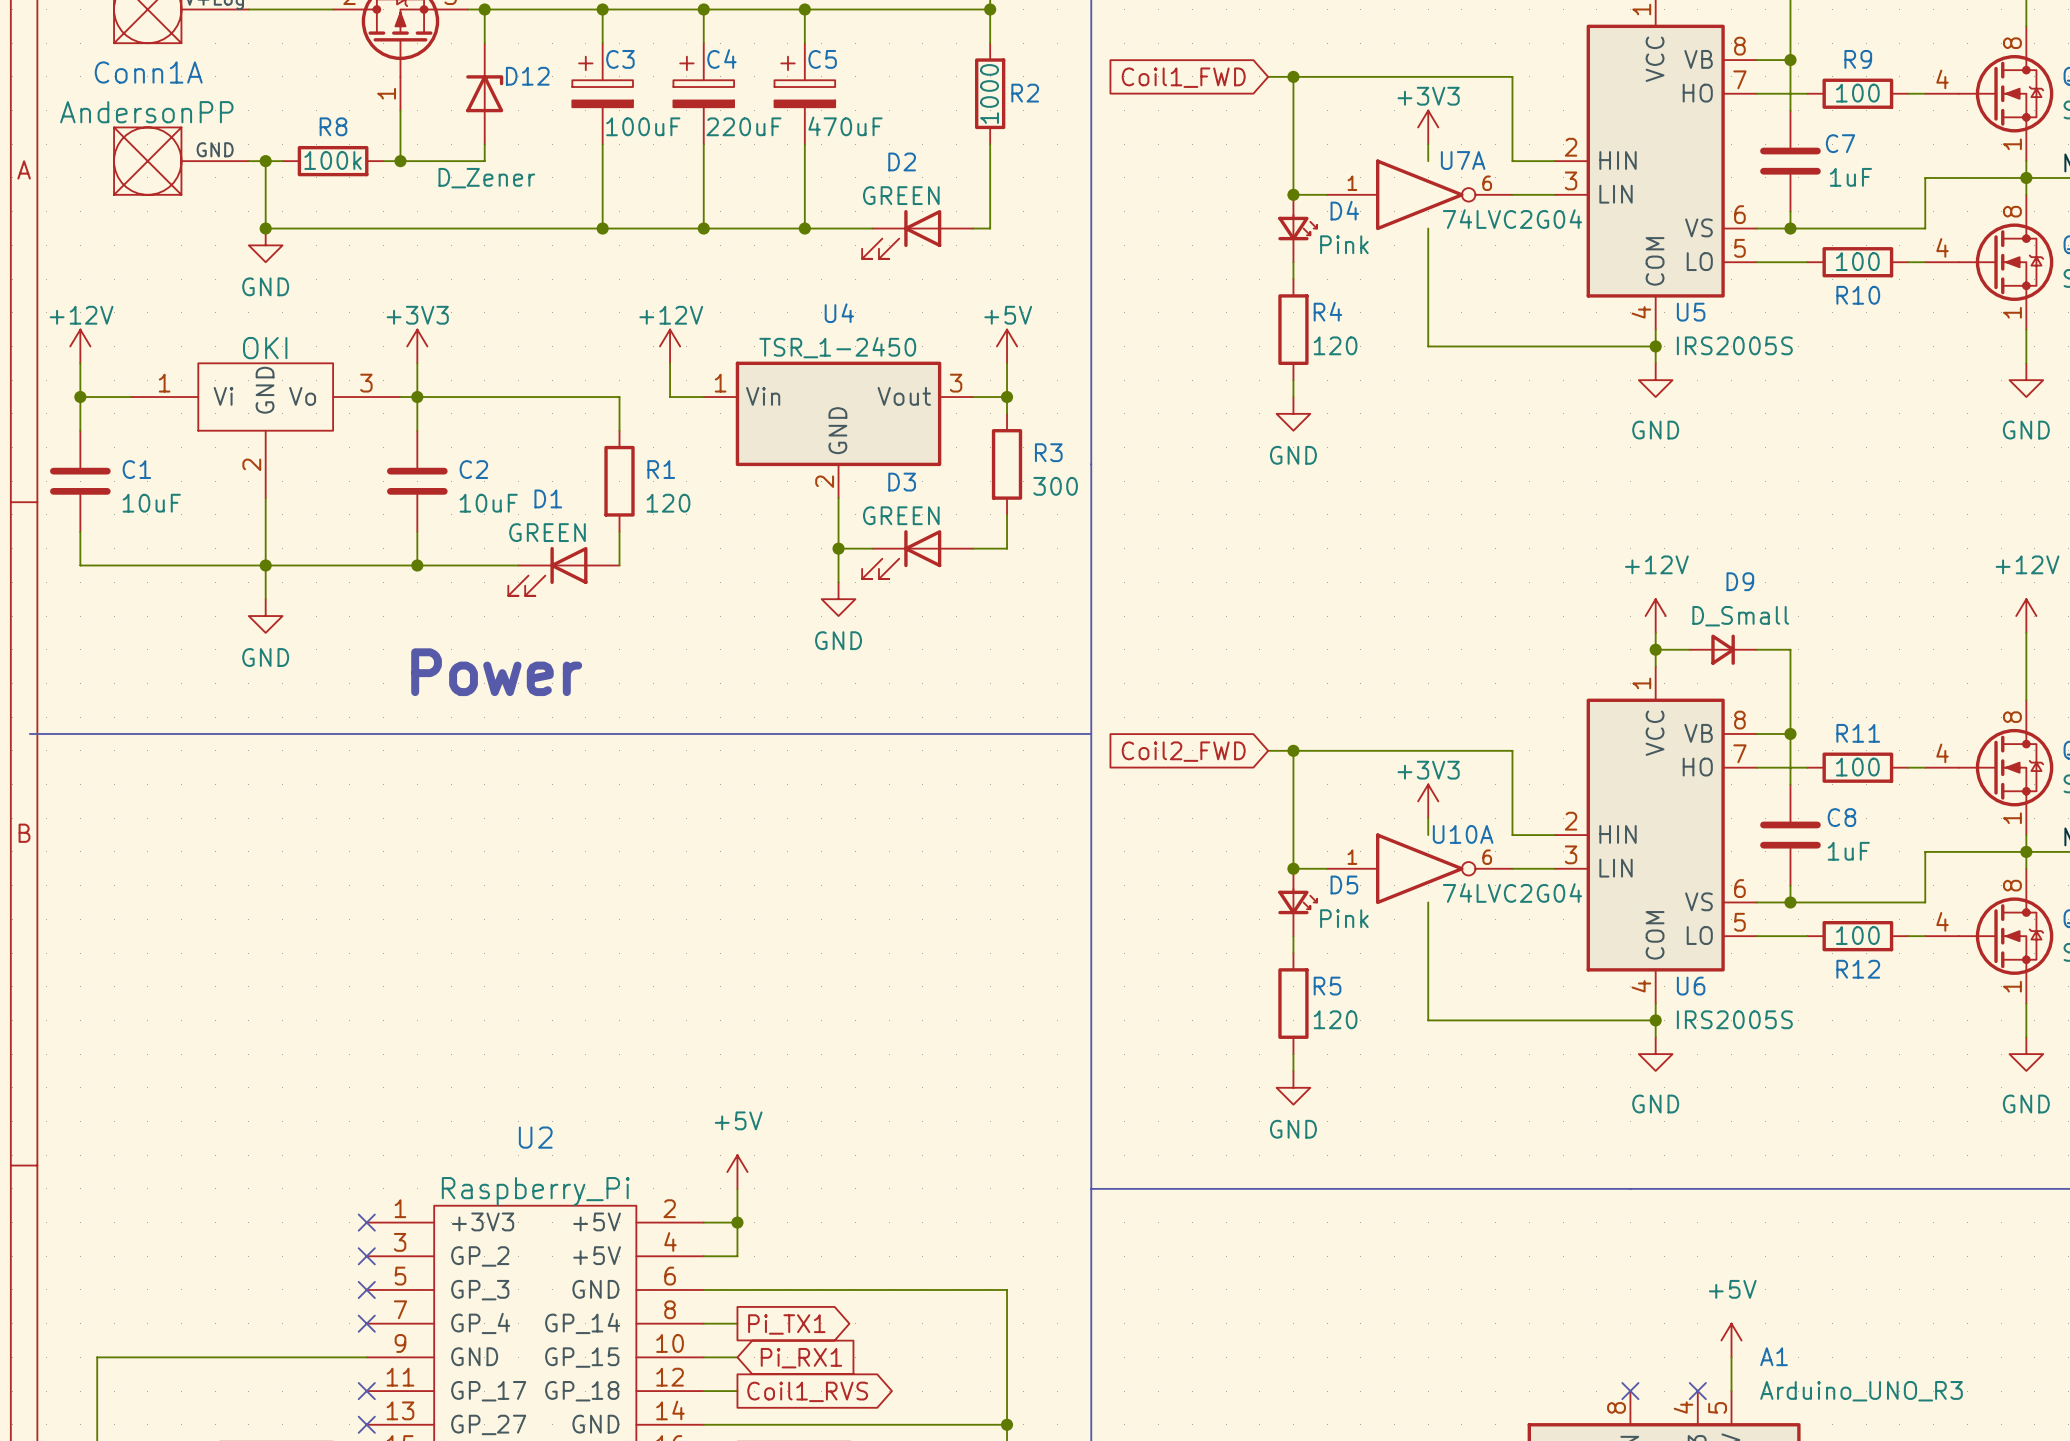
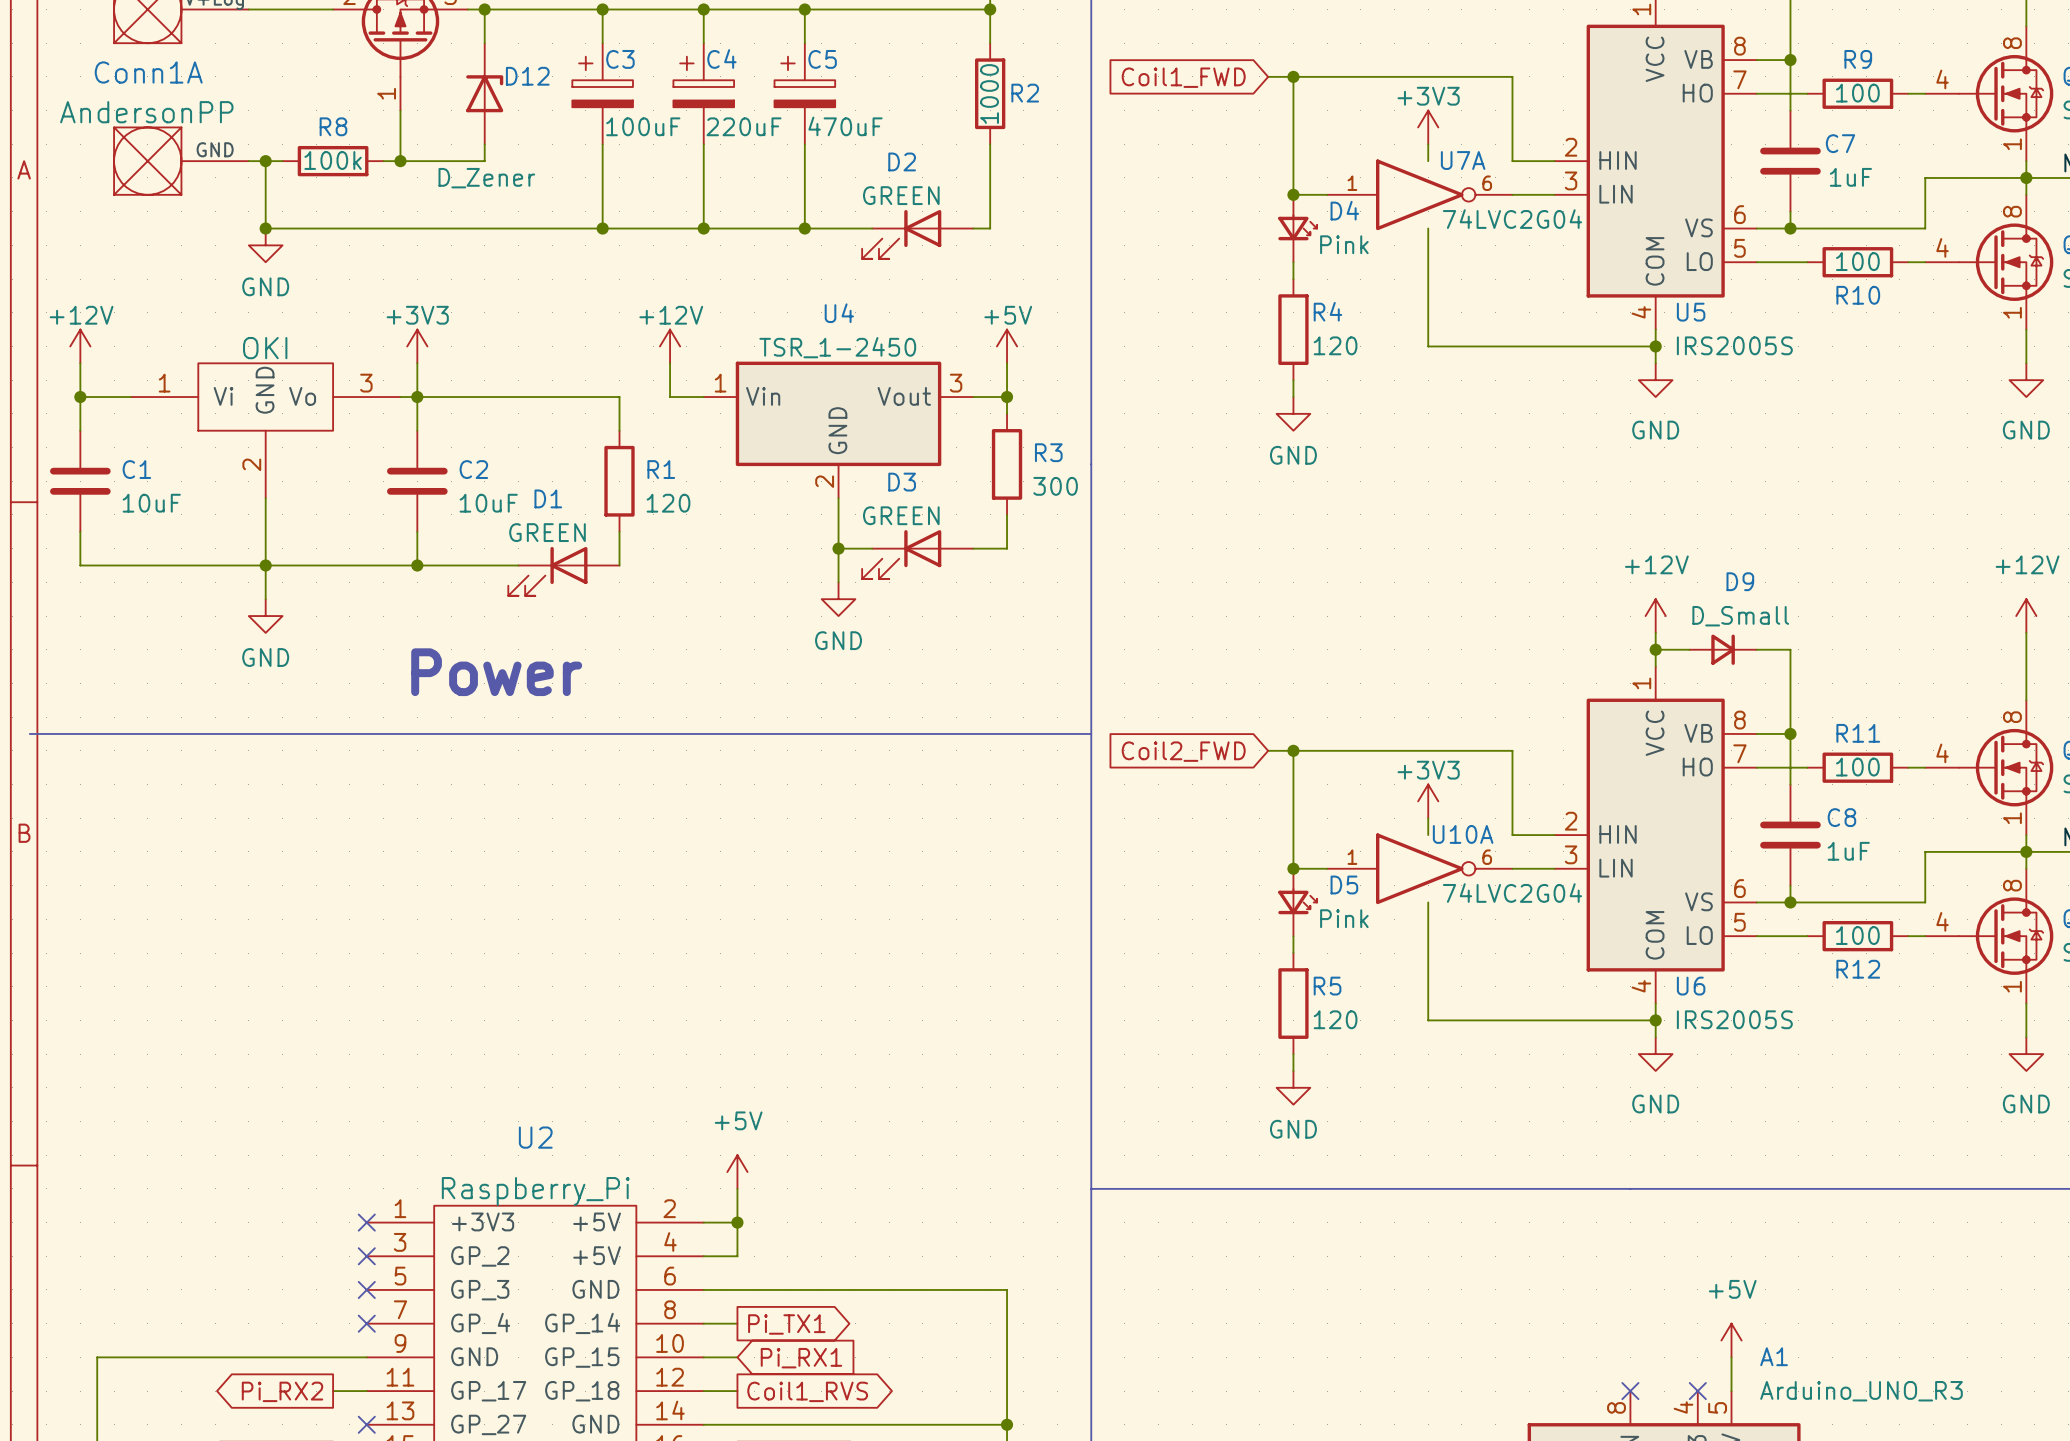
global label: none -> Pi_RX2 (282, 1391)
wire: none -> (333, 1391) (366, 1391)
no-connect mark: (366, 1391) -> none

